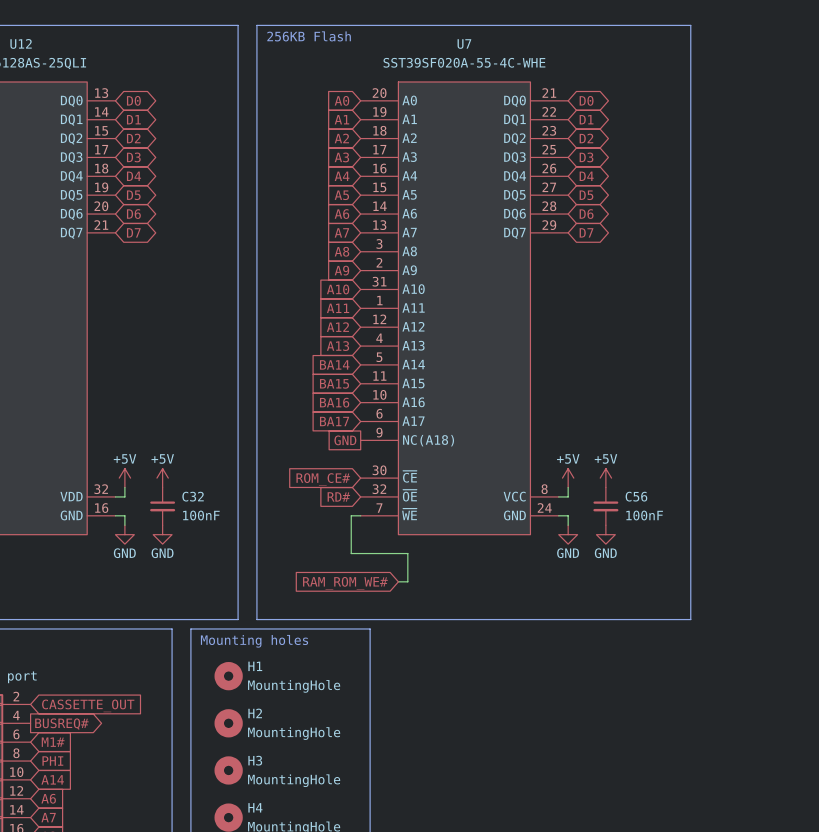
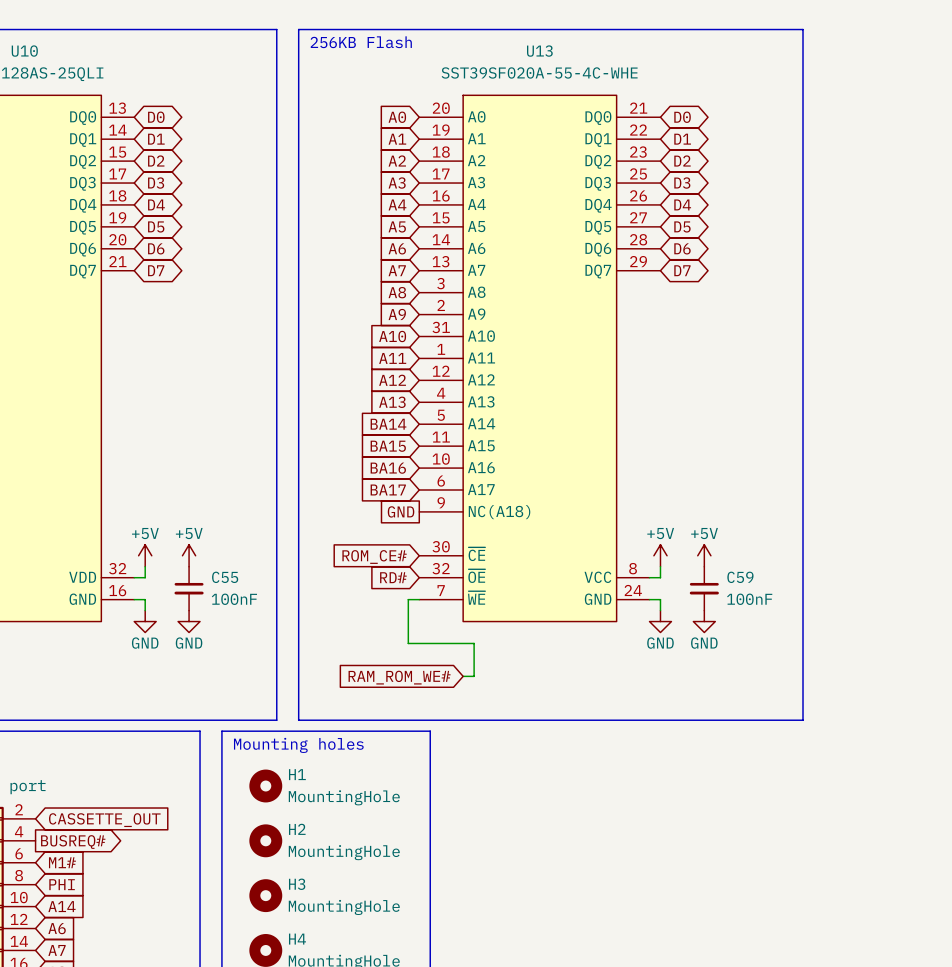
U12 name: U12 (21, 43) -> U10 (24, 51)
U7 name: U7 (464, 44) -> U13 (539, 51)
C32 name: C32 (193, 496) -> C55 (225, 577)
C56 name: C56 (636, 496) -> C59 (740, 577)

